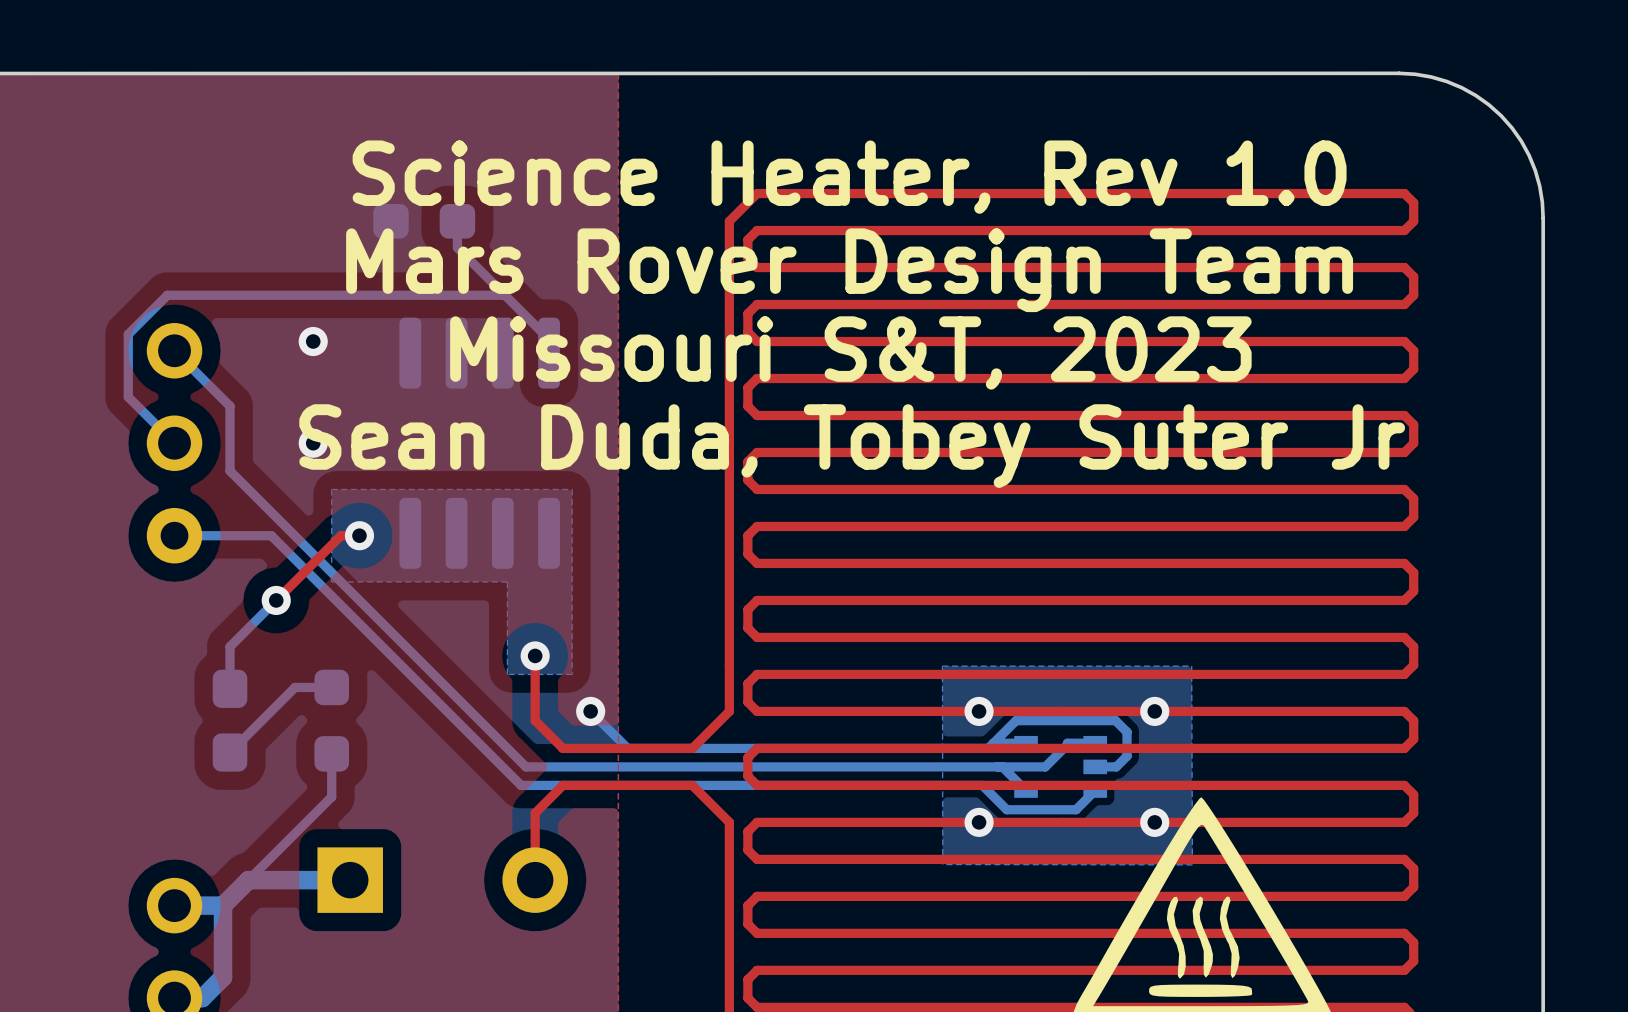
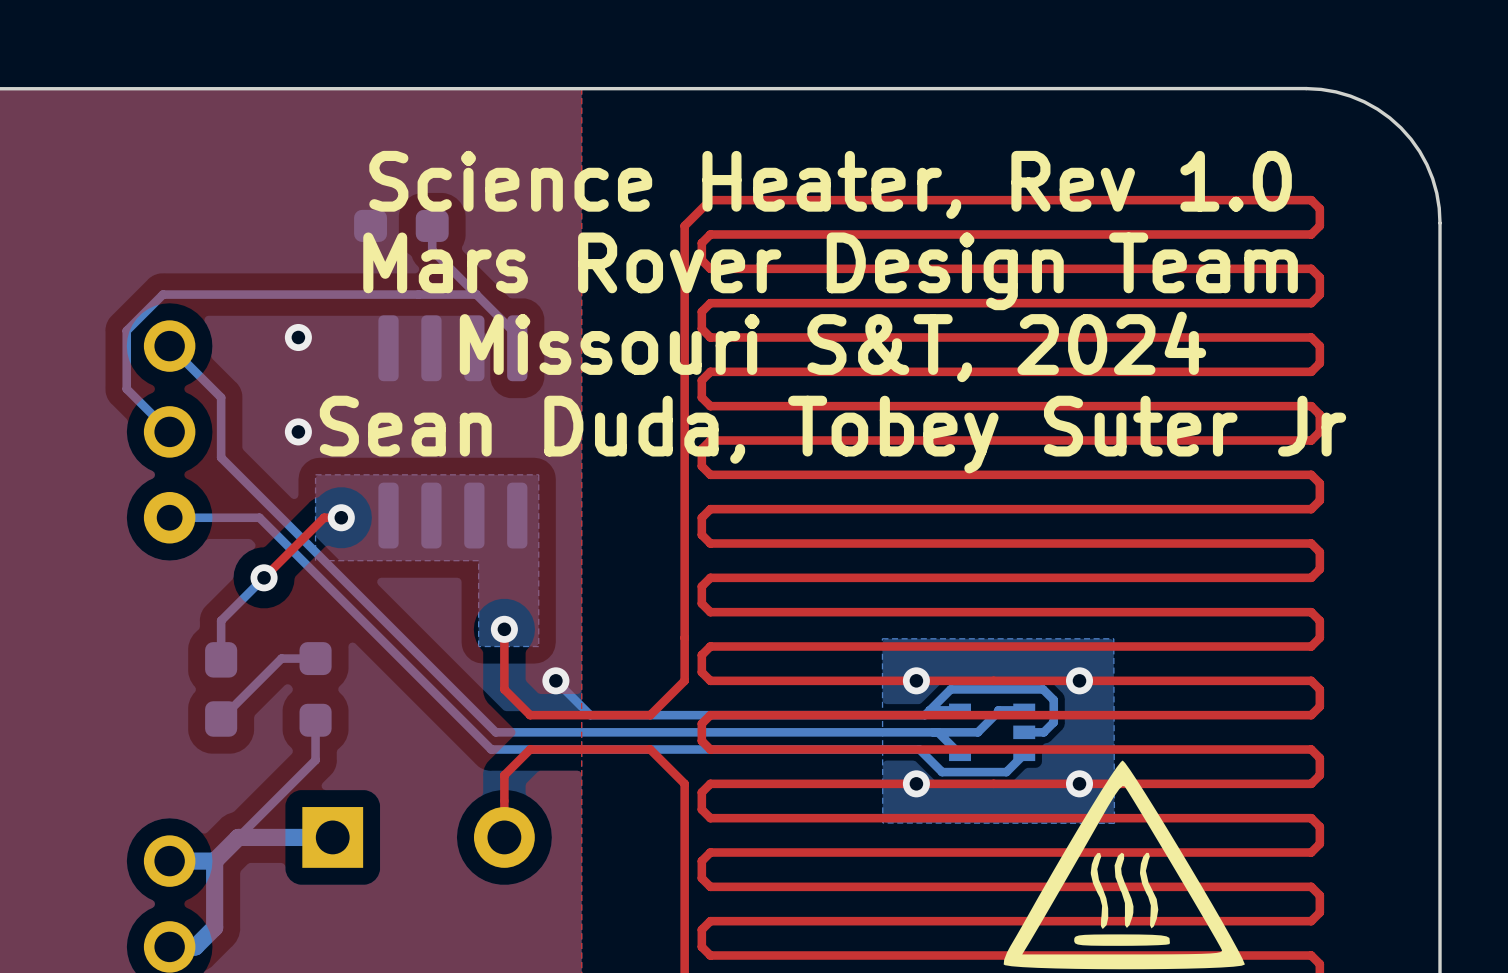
text position: Science Heater, Rev 1.0 (849, 177) -> Science Heater, Rev 1.0 (830, 184)
text position: Mars Rover Design Team (849, 270) -> Mars Rover Design Team (830, 271)
text: Missouri S&T, 2023 (850, 352) -> Missouri S&T, 2024 (832, 346)
text position: Sean Duda, Tobey Suter Jr (852, 446) -> Sean Duda, Tobey Suter Jr (832, 434)

